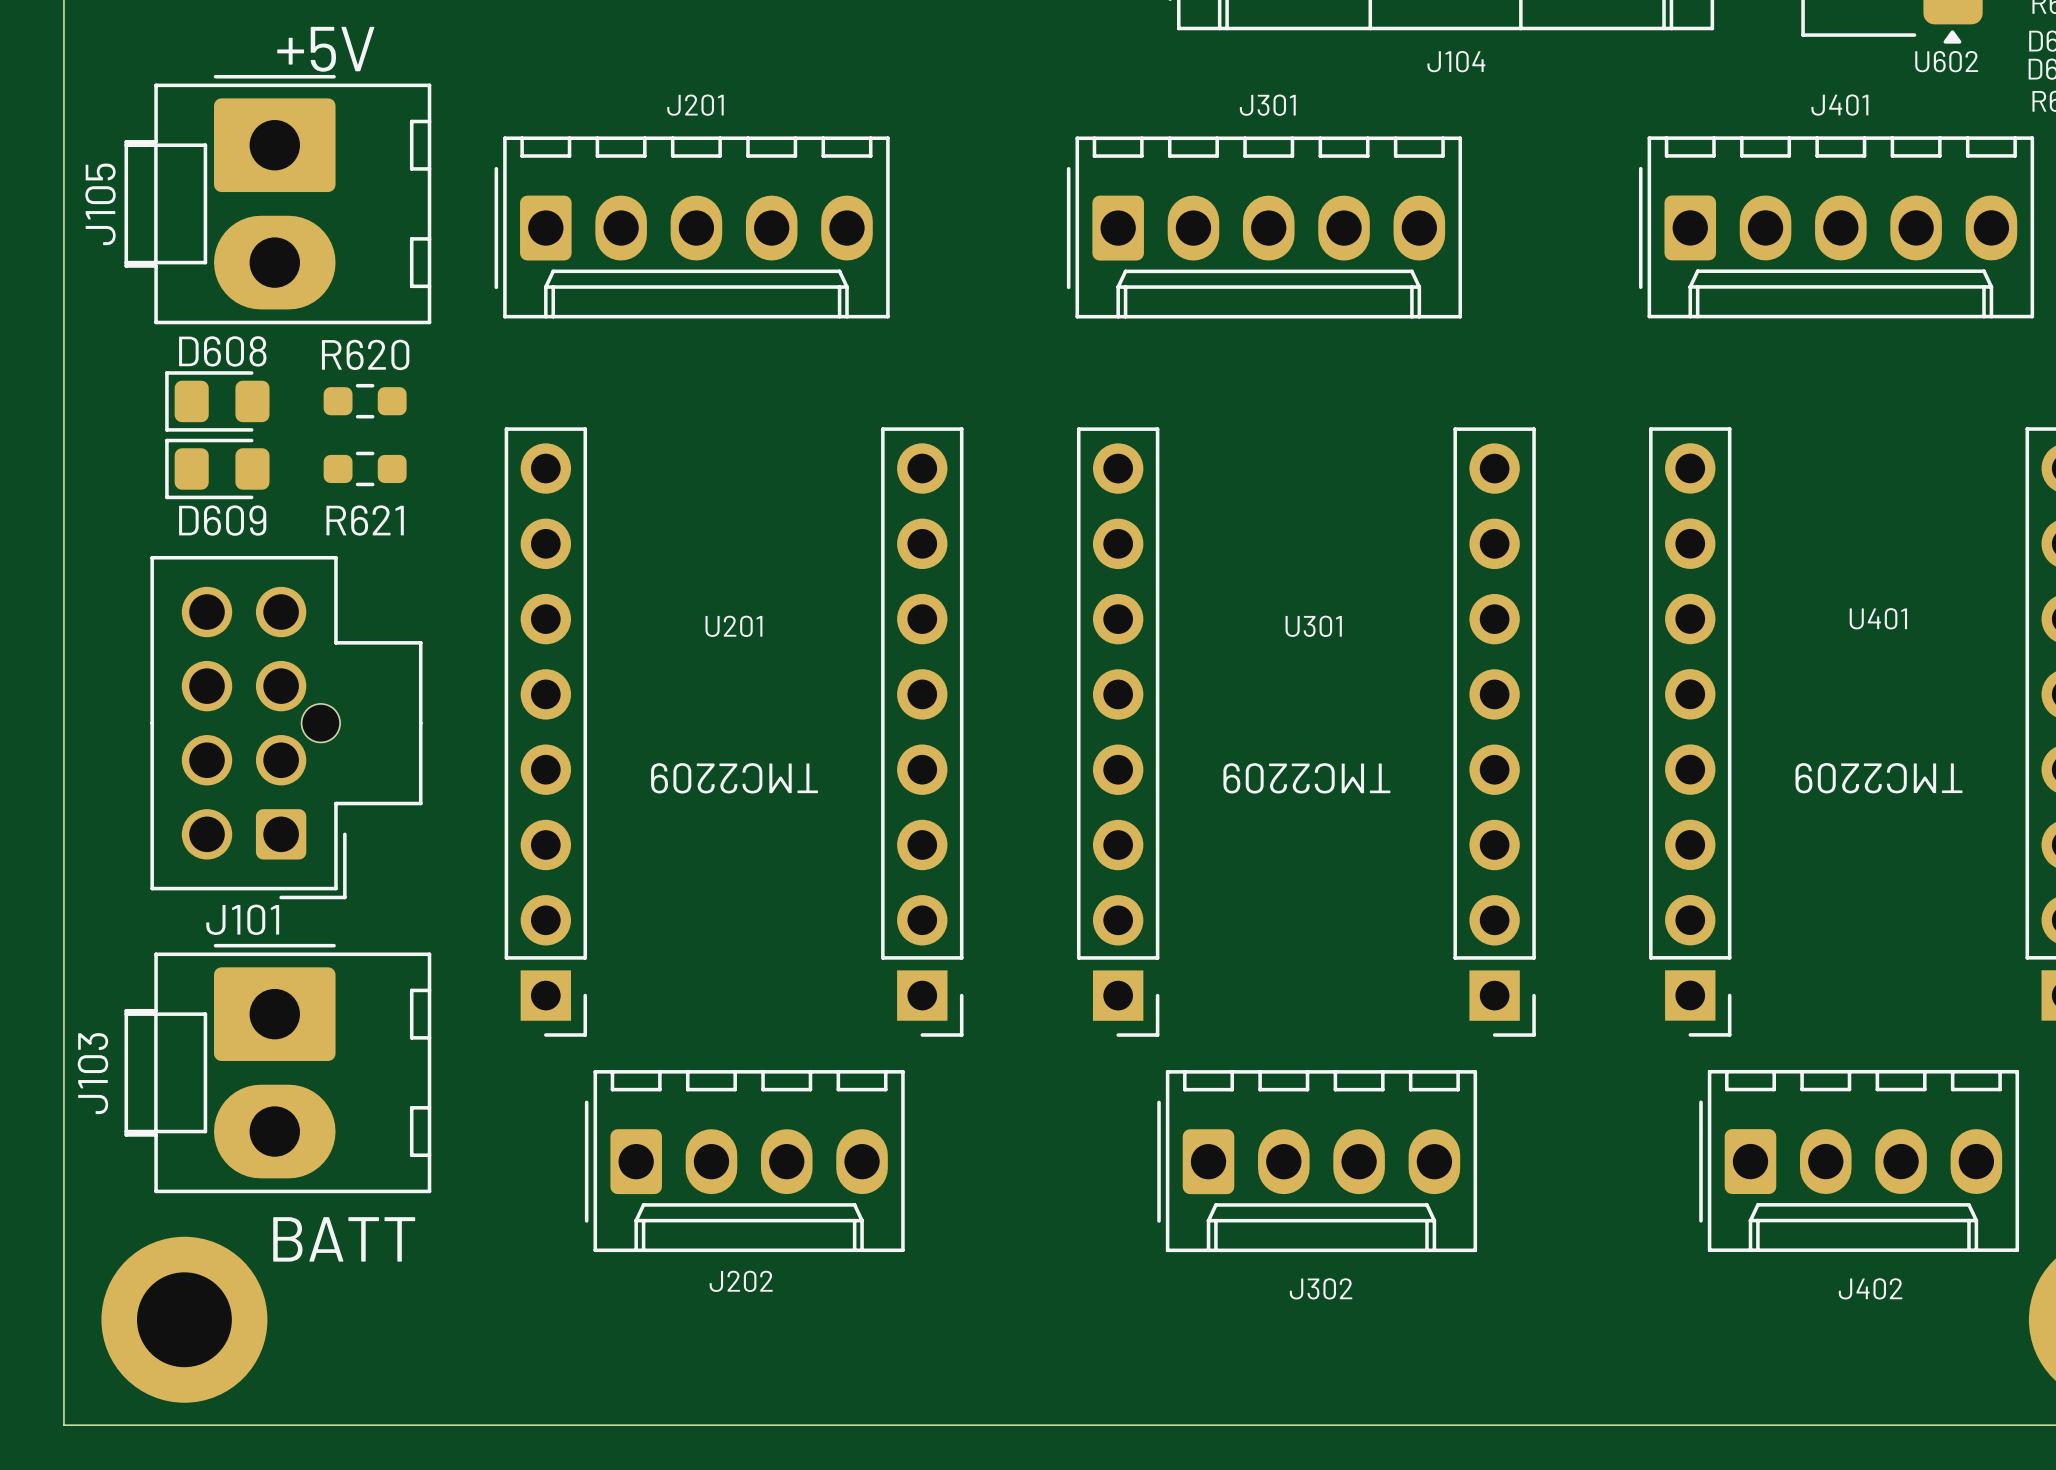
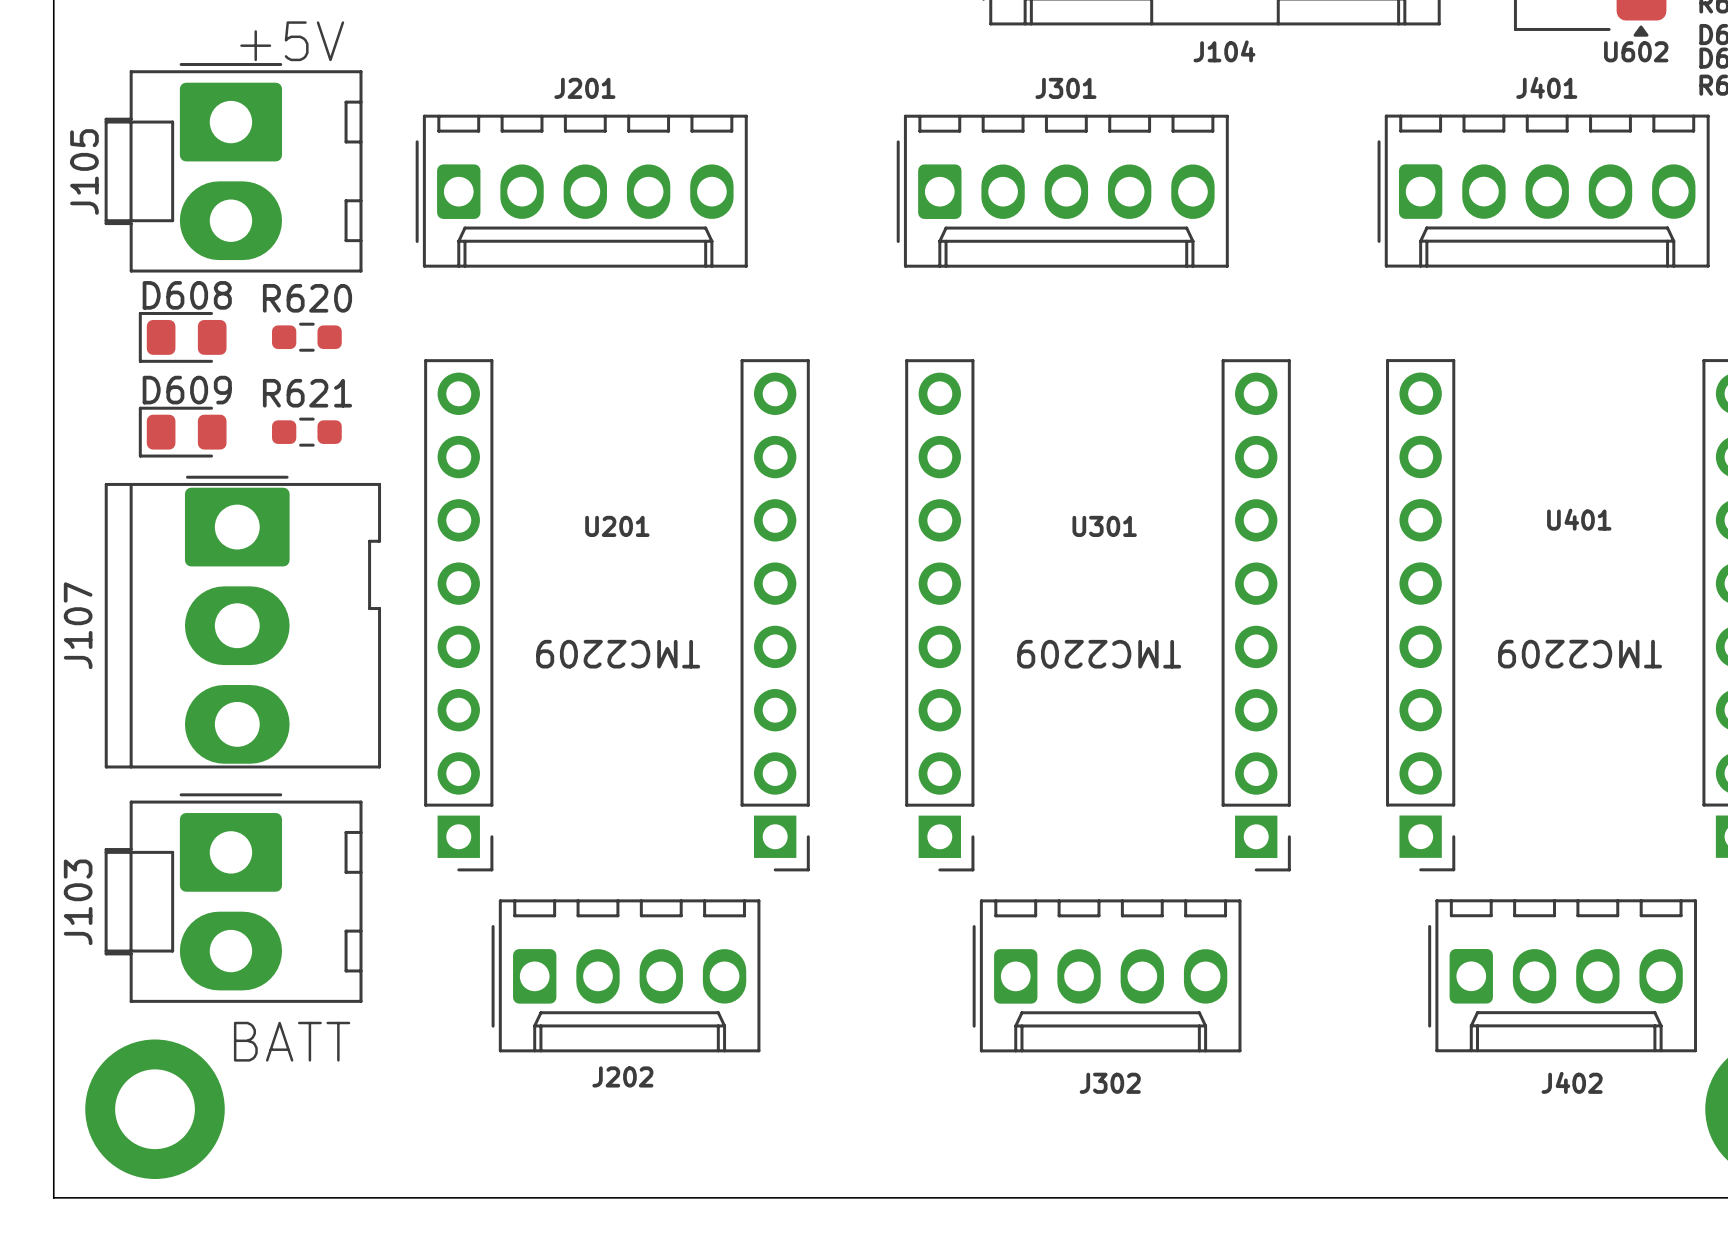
D609 position: (217, 468) -> (182, 432)
R621 position: (365, 468) -> (306, 432)
D609 name position: D609 (222, 520) -> D609 (187, 390)
R621 name position: R621 (365, 520) -> R621 (307, 393)
J101: (286, 727) -> none
J107: none -> (242, 622)

